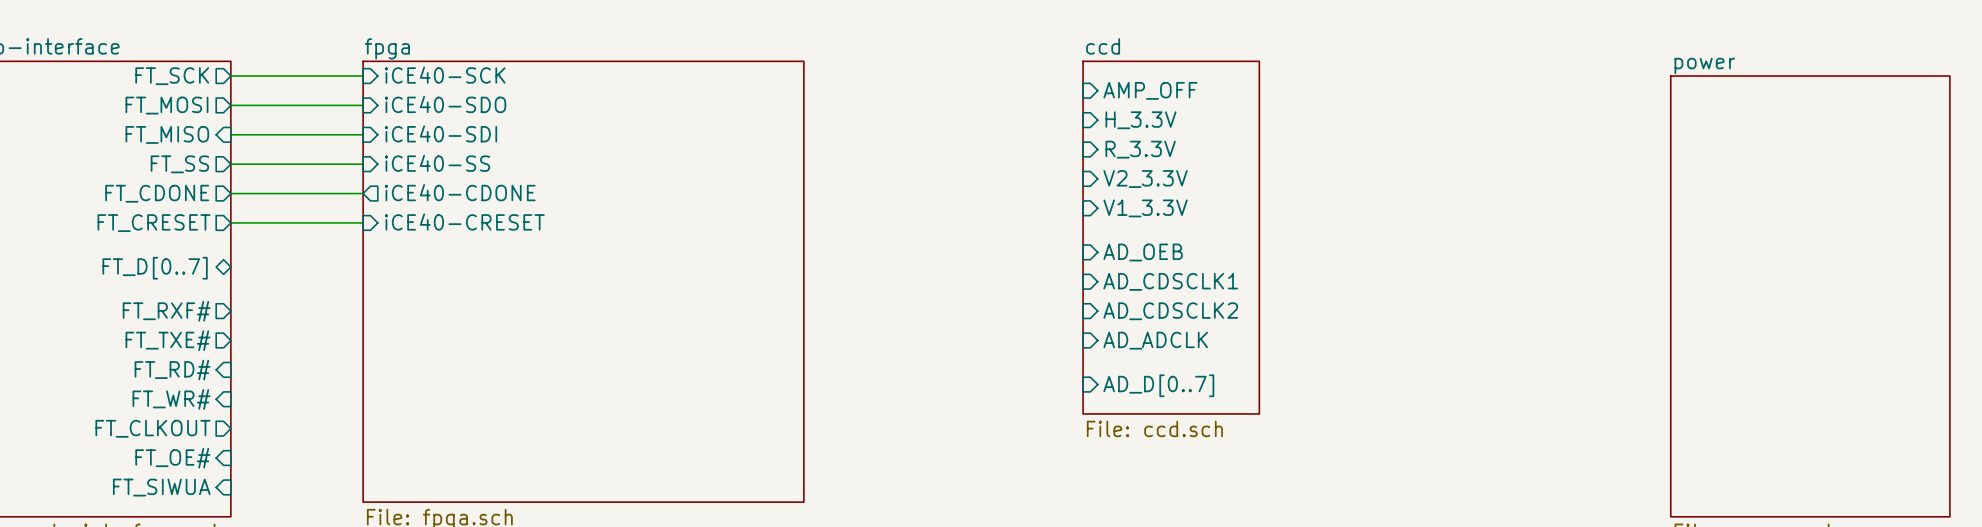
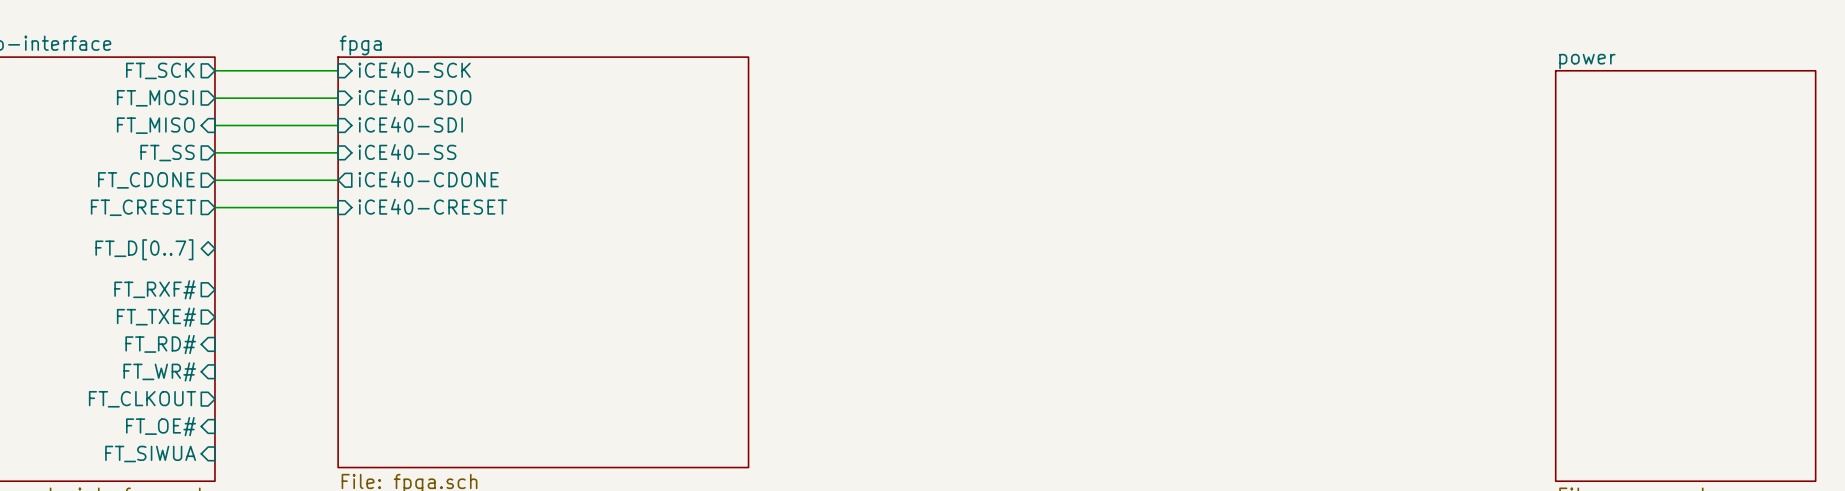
sheet pin: AMP_OFF (1150, 90) -> none
sheet pin: H_3.3V (1141, 120) -> none
sheet pin: R_3.3V (1140, 149) -> none
sheet pin: V2_3.3V (1145, 179) -> none
sheet pin: V1_3.3V (1145, 208) -> none
sheet ccd: File: ccd.sch (1171, 237) -> none
sheet pin: AD_OEB (1143, 252) -> none
sheet pin: AD_CDSCLK1 (1170, 281) -> none
sheet pin: AD_CDSCLK2 (1170, 311) -> none
sheet pin: AD_ADCLK (1155, 340) -> none
sheet pin: AD_D[0..7] (1158, 385) -> none

